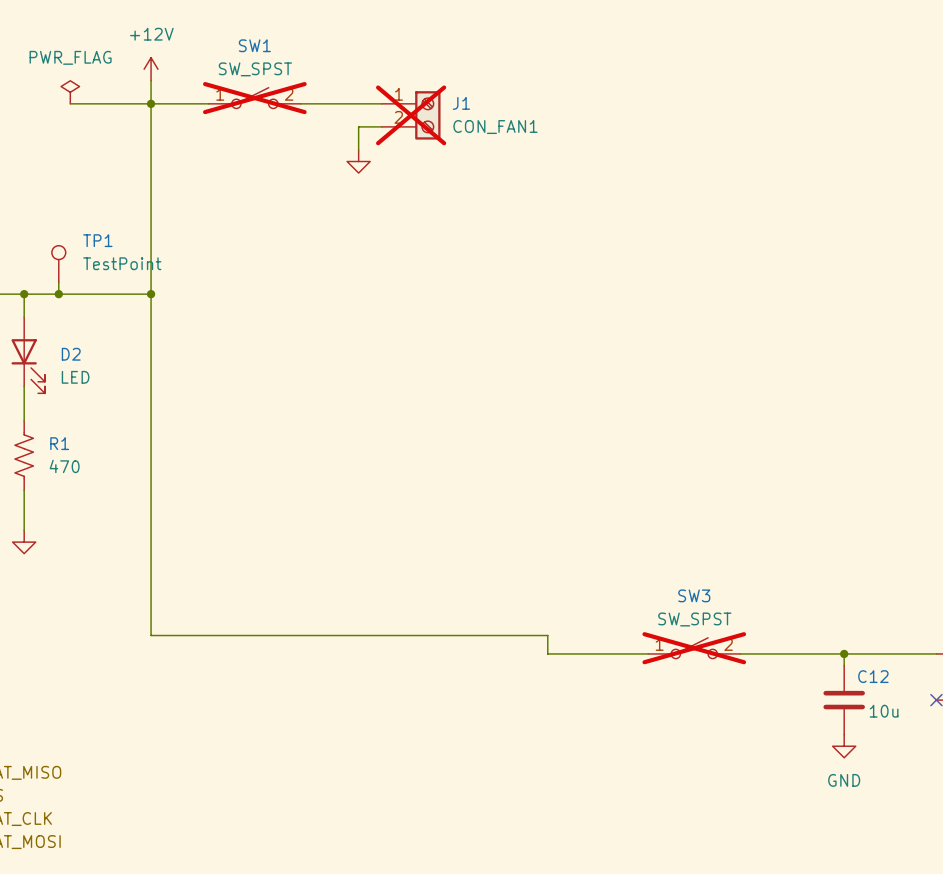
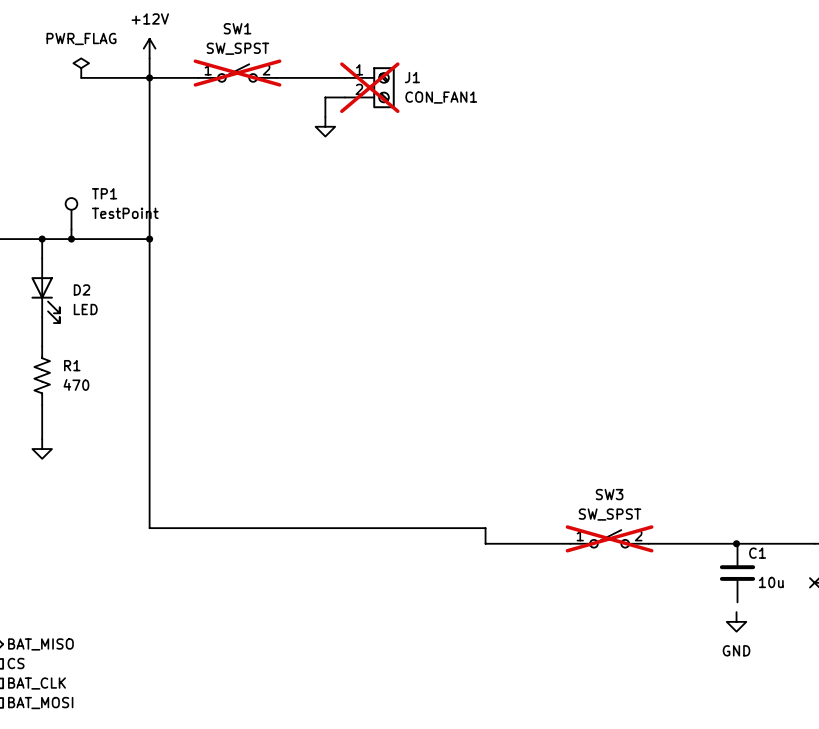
C1: none -> 10u (737, 573)
C12: 10u (844, 700) -> none

